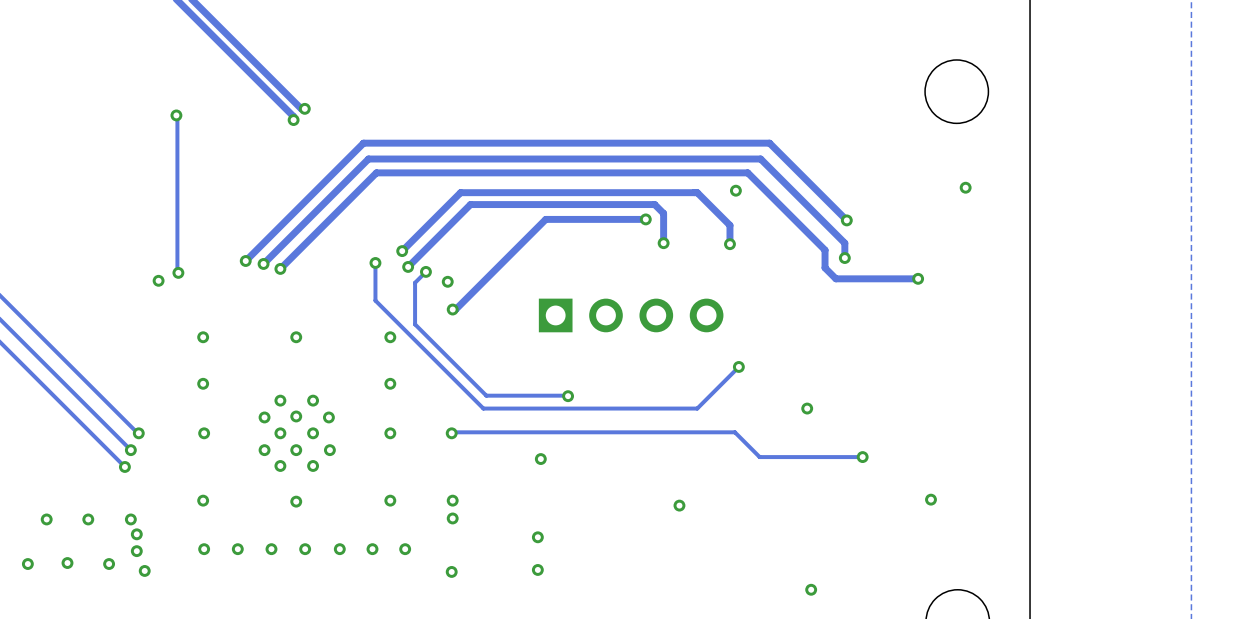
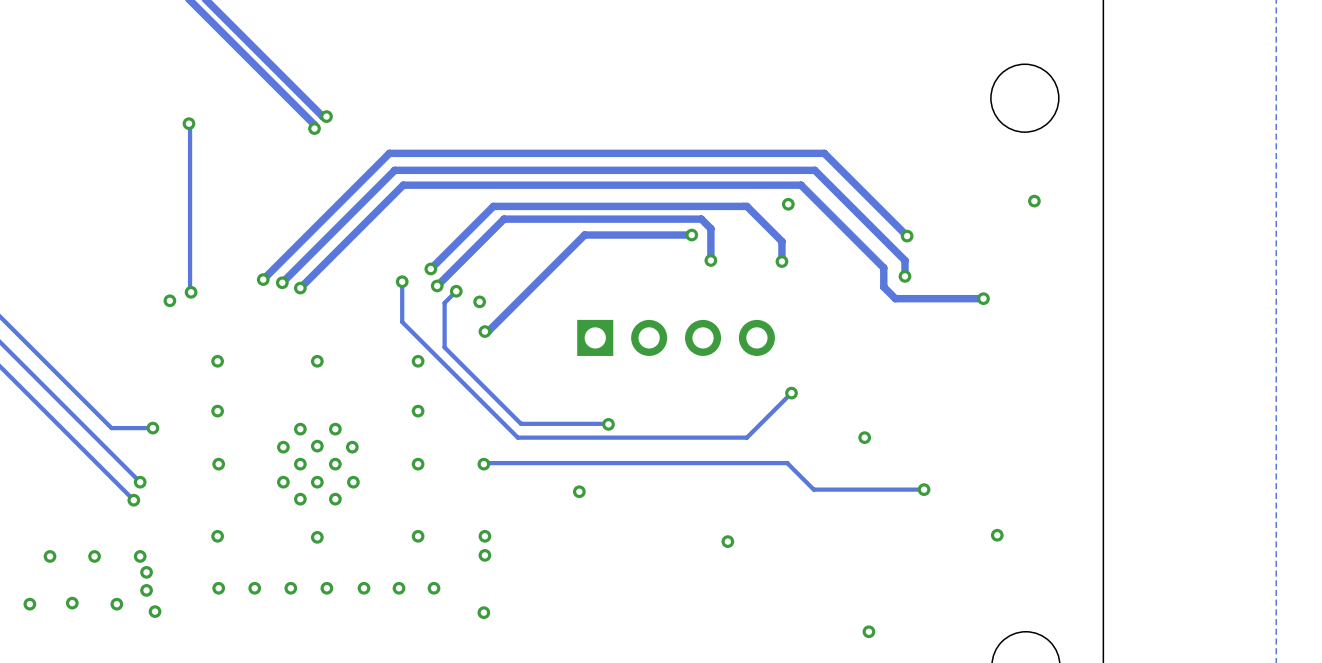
track: (104, 399) (138, 433) -> (111, 428) (152, 428)
via position: (138, 433) -> (152, 428)
via: (537, 537) -> none
via: (537, 569) -> none

